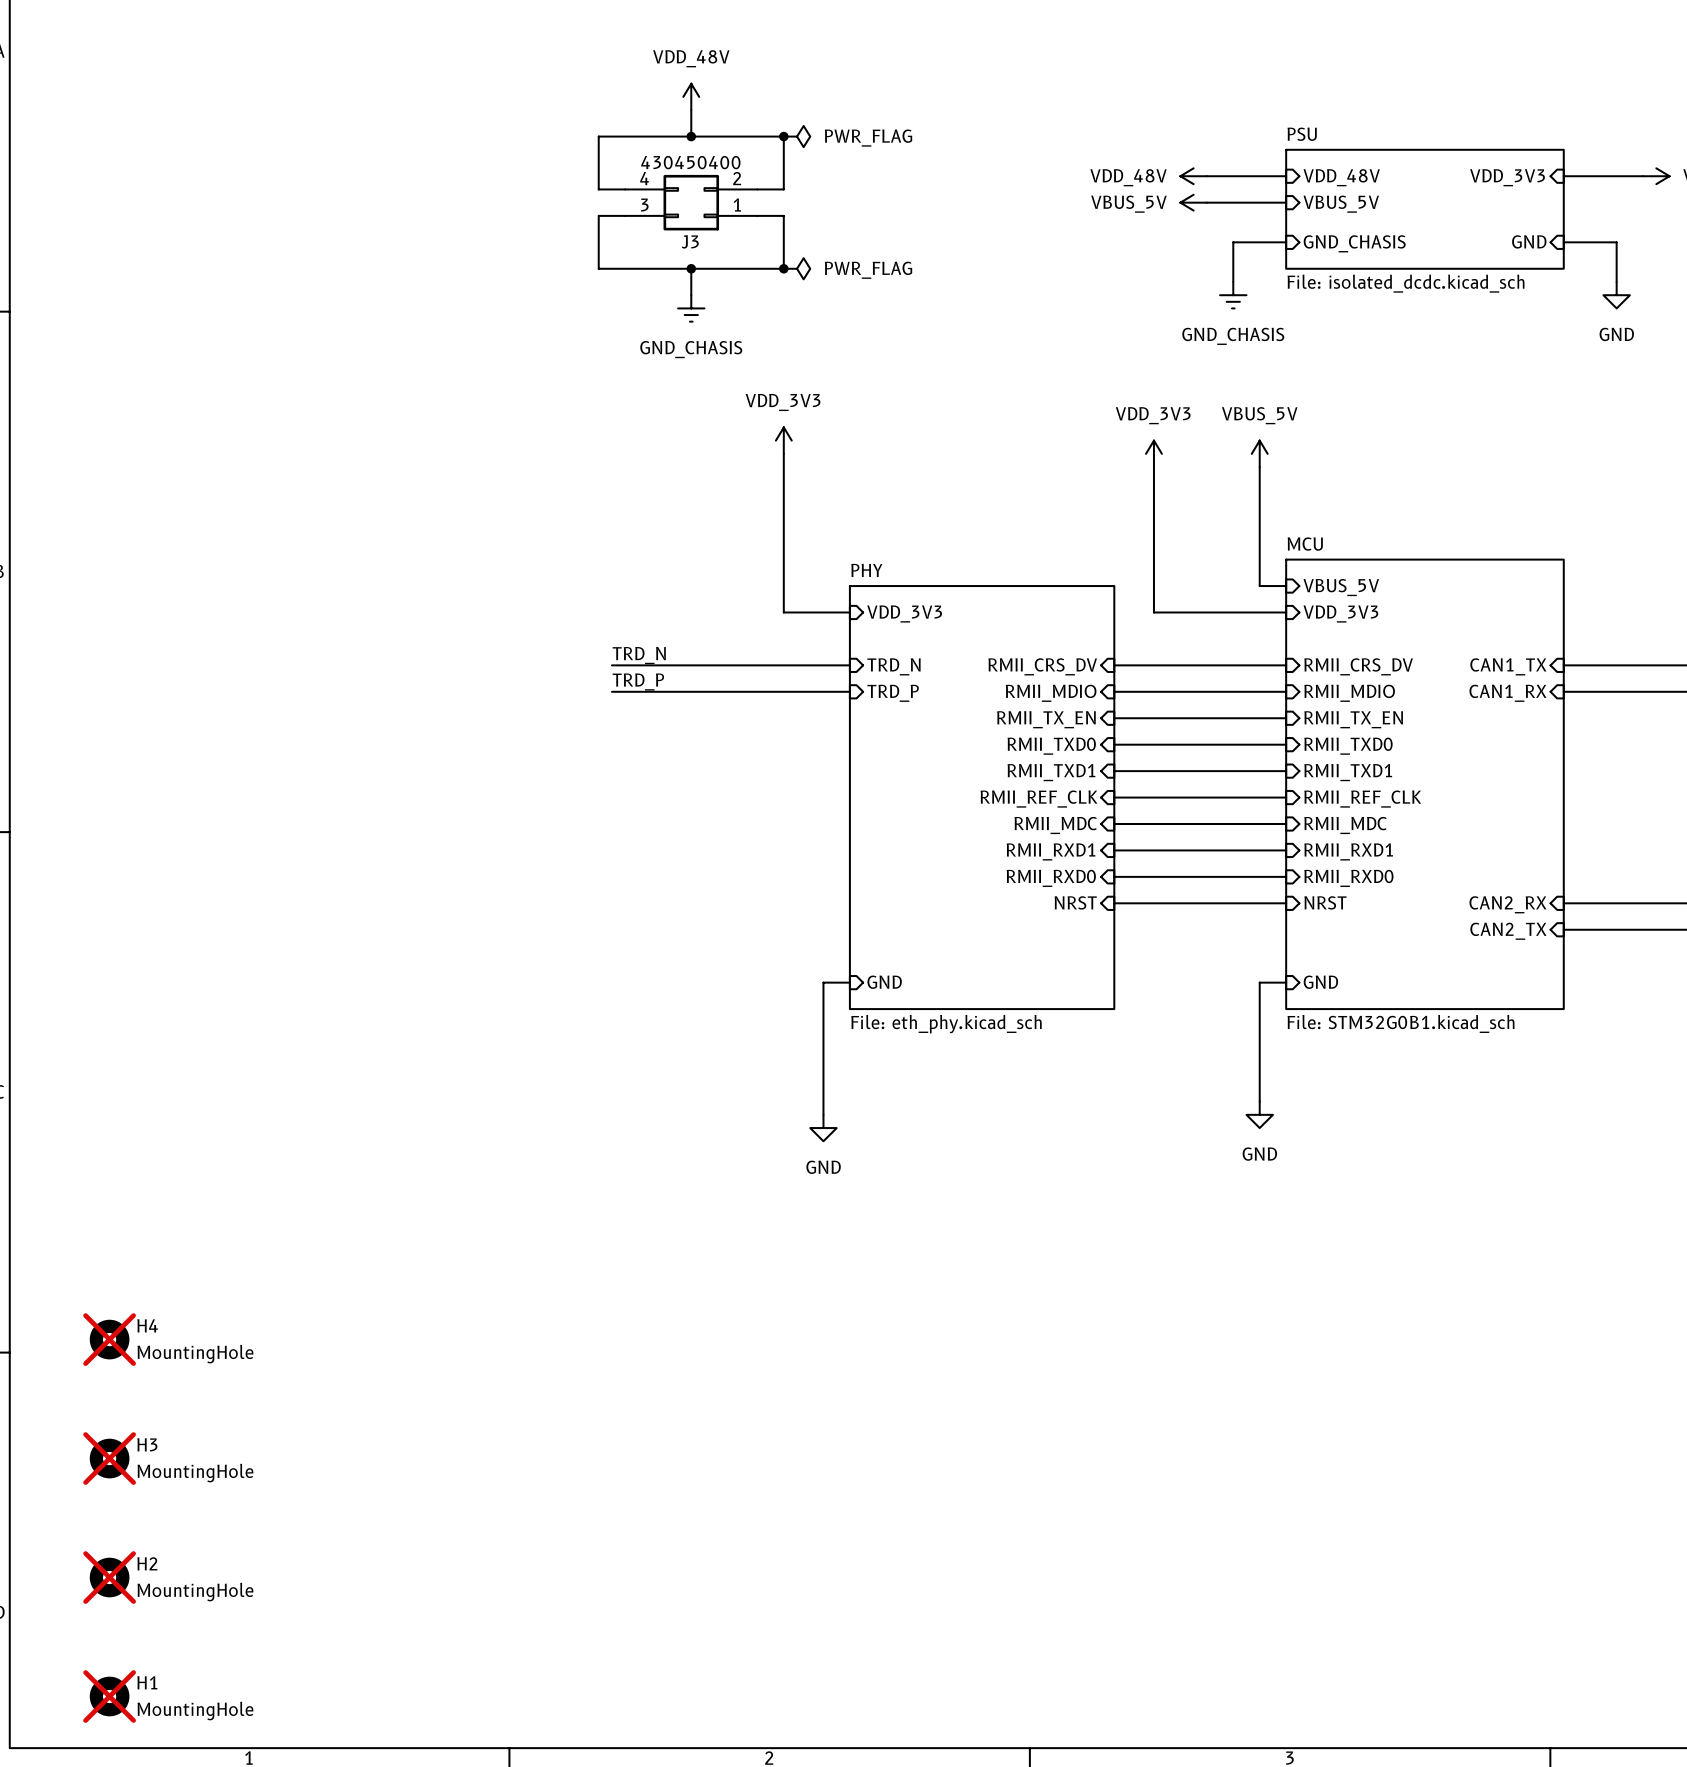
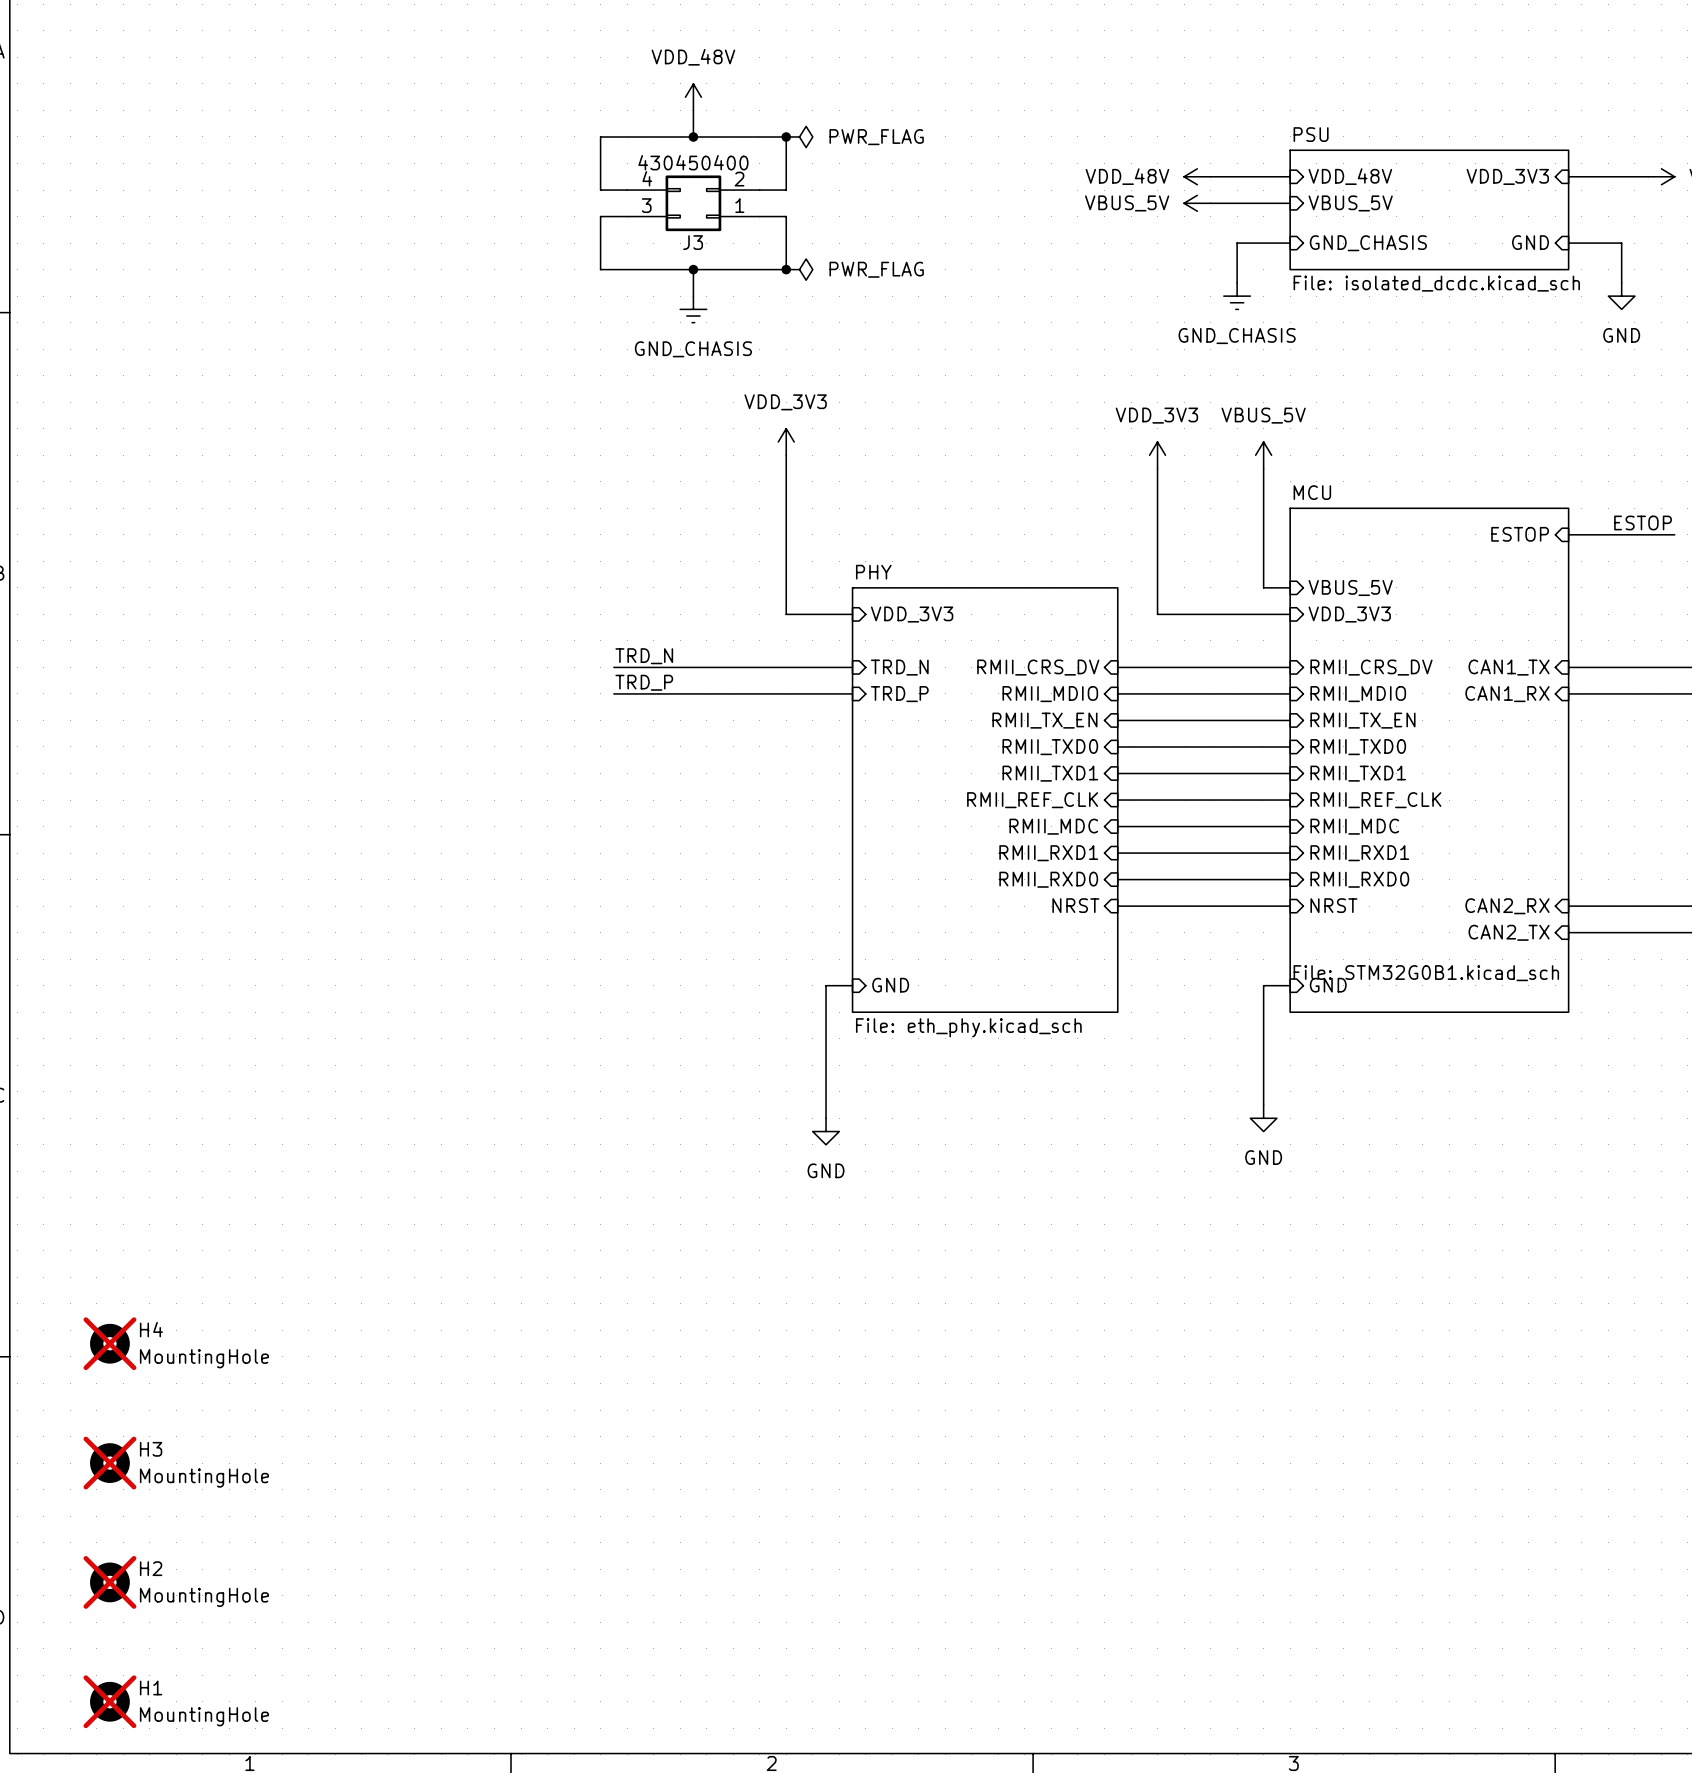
label: none -> ESTOP (1643, 522)
sheet pin: none -> ESTOP (1520, 534)
wire: none -> (1568, 534) (1674, 534)
sheet MCU: none -> File: STM32G0B1.kicad_sch (1429, 760)
sheet MCU: File: STM32G0B1.kicad_sch (1424, 784) -> none

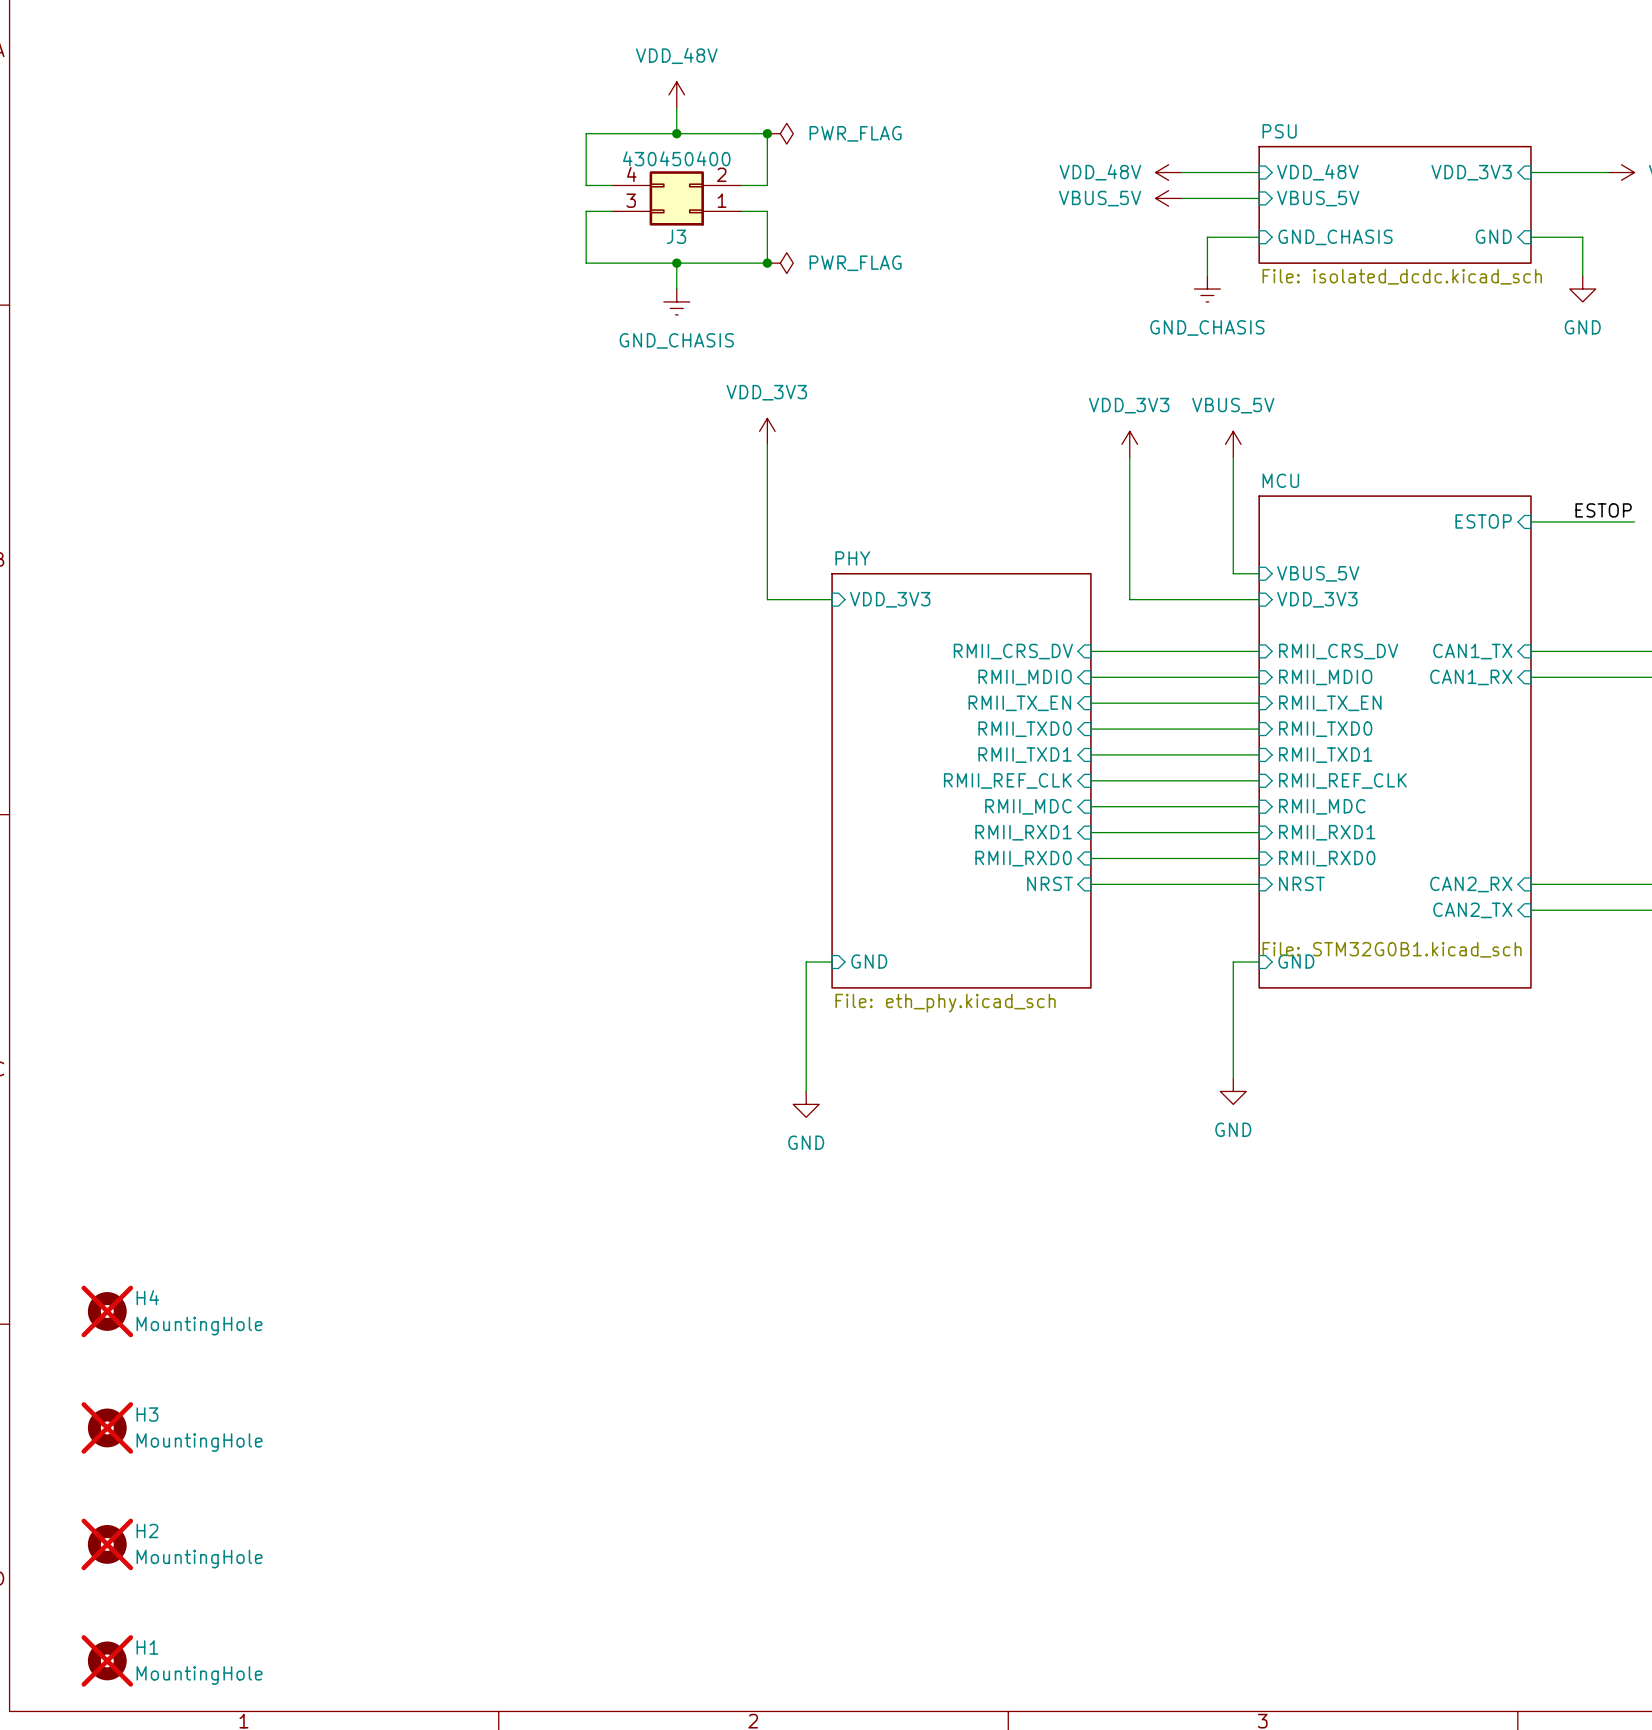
label: TRD_N (644, 656) -> none
wire: (613, 667) (852, 667) -> none
sheet pin: TRD_N (899, 667) -> none
label: TRD_P (644, 682) -> none
wire: (613, 693) (852, 693) -> none
sheet pin: TRD_P (899, 694) -> none

